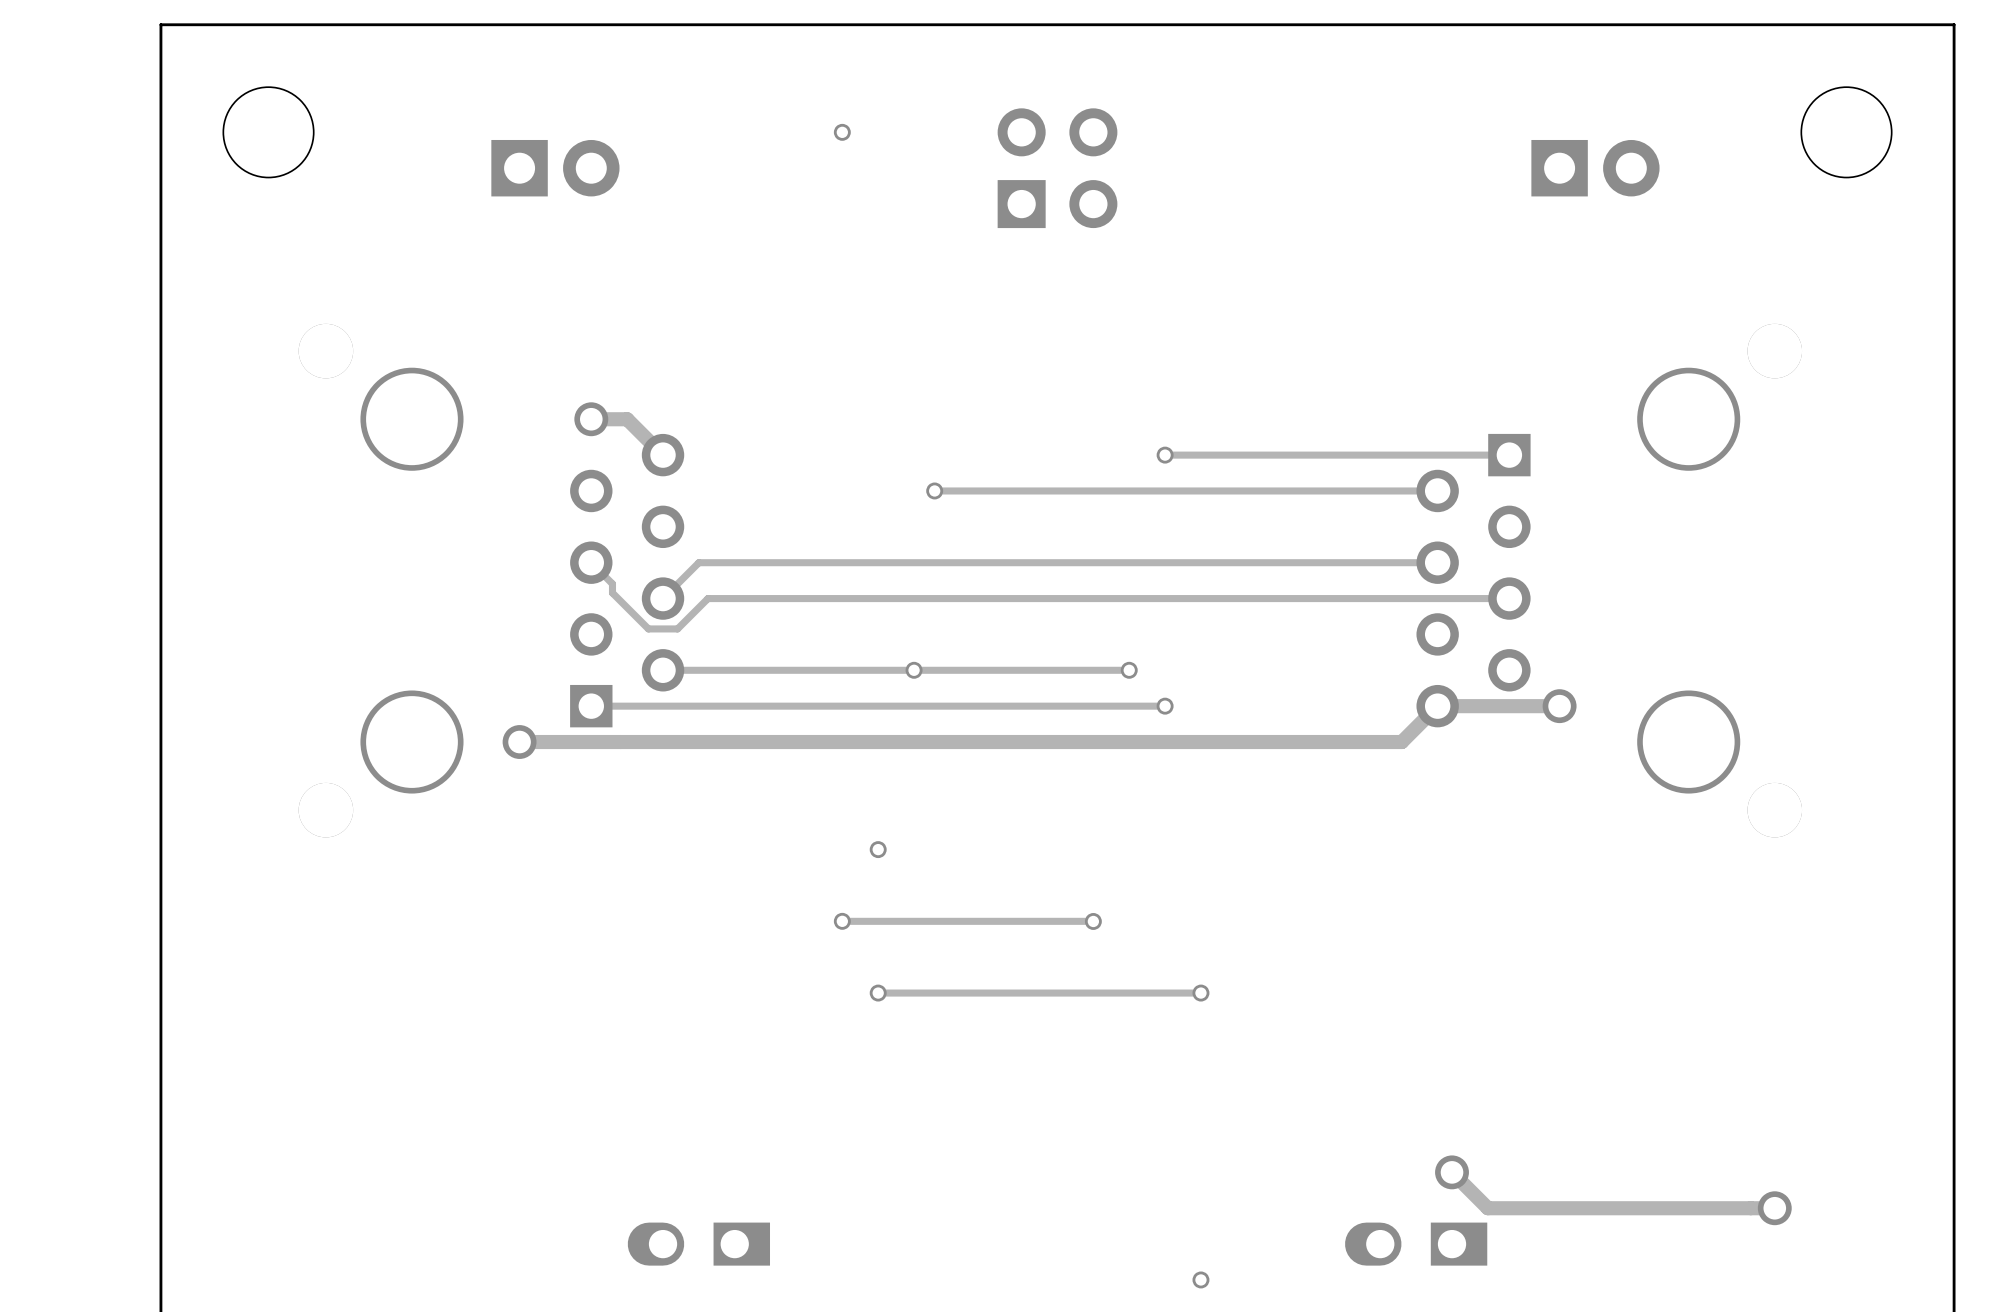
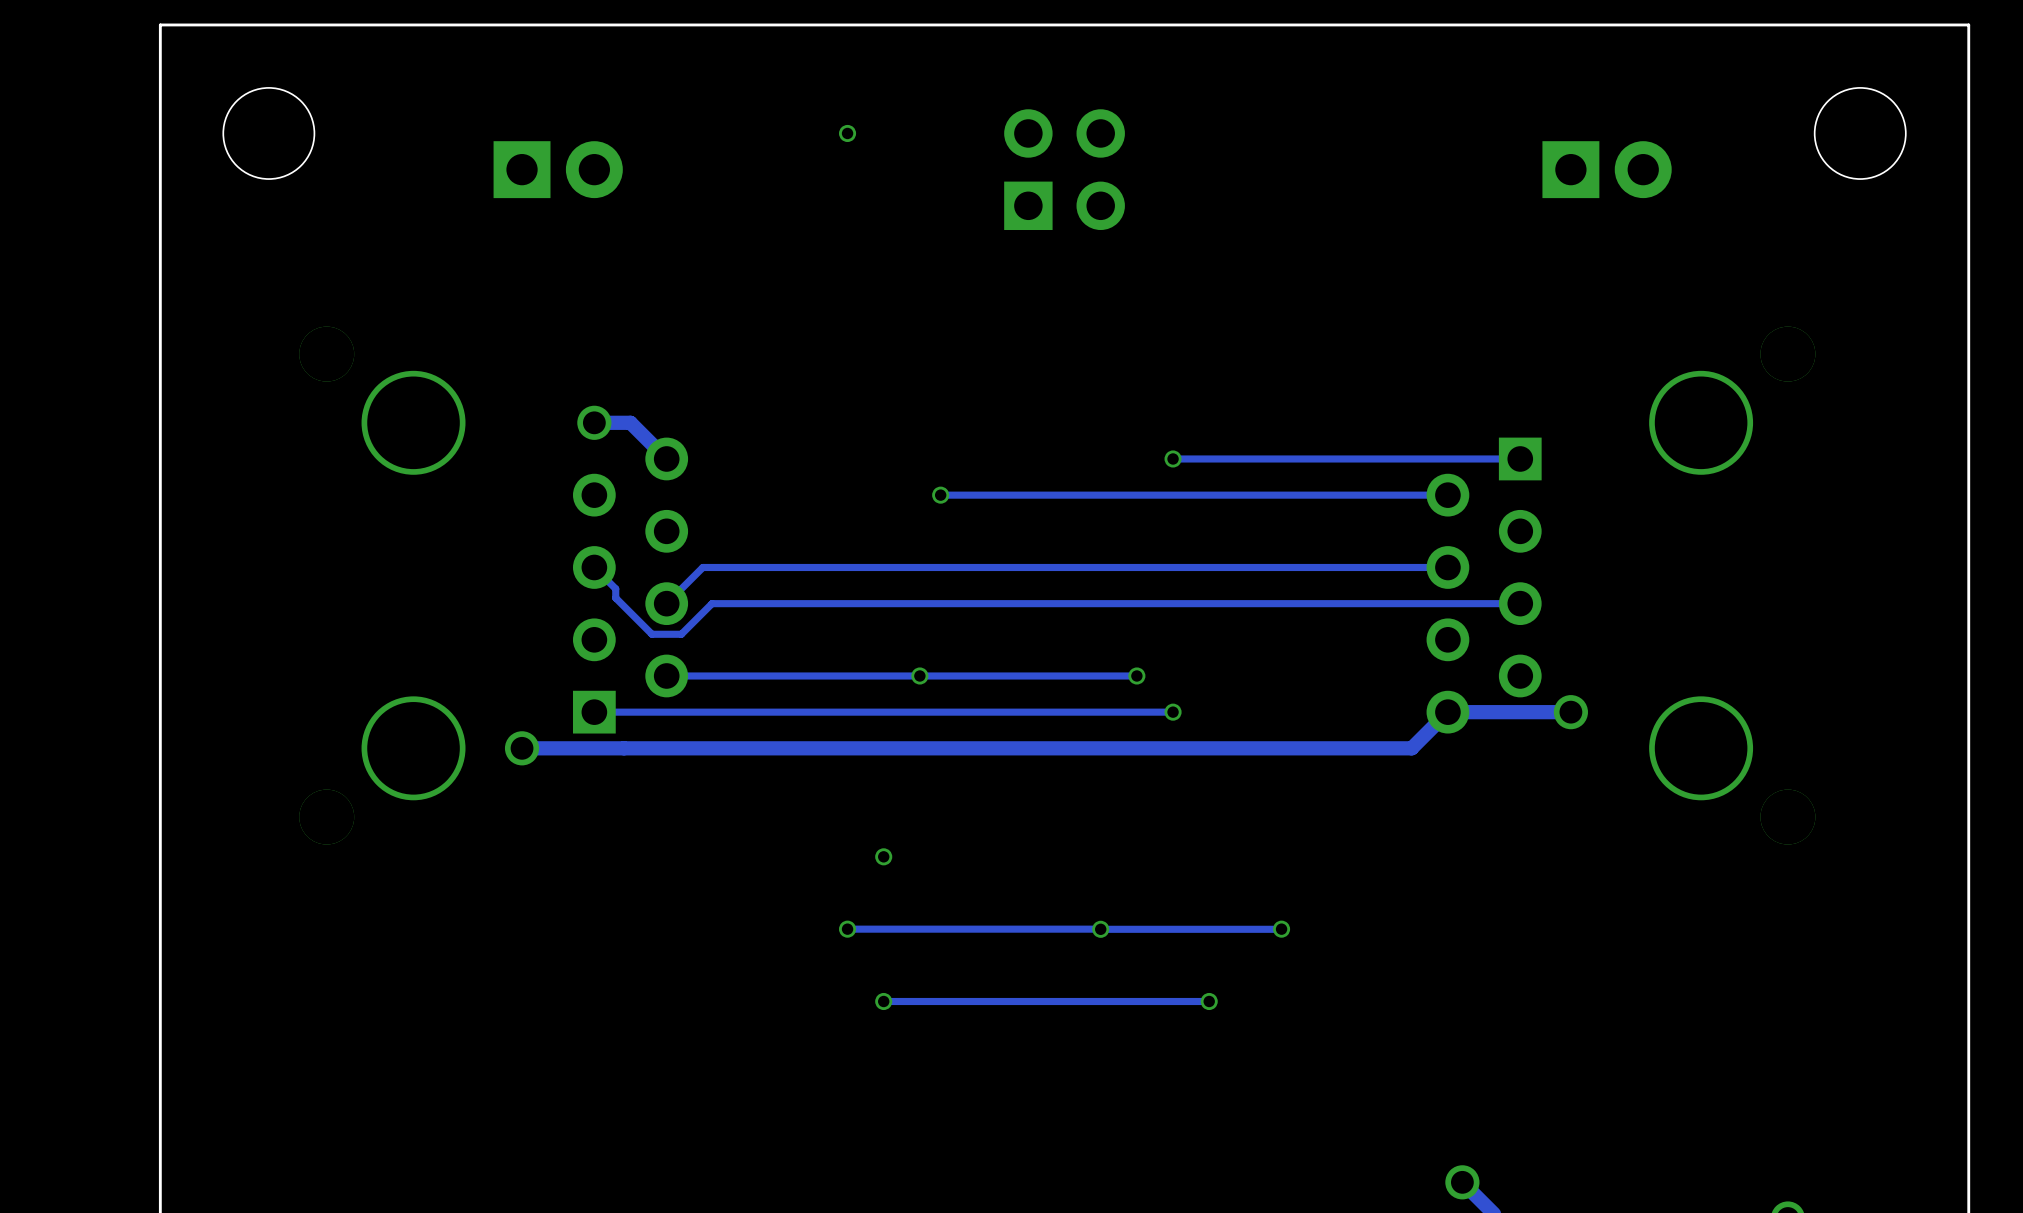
track: none -> (1281, 929) (1100, 929)
via: none -> (1281, 929)

